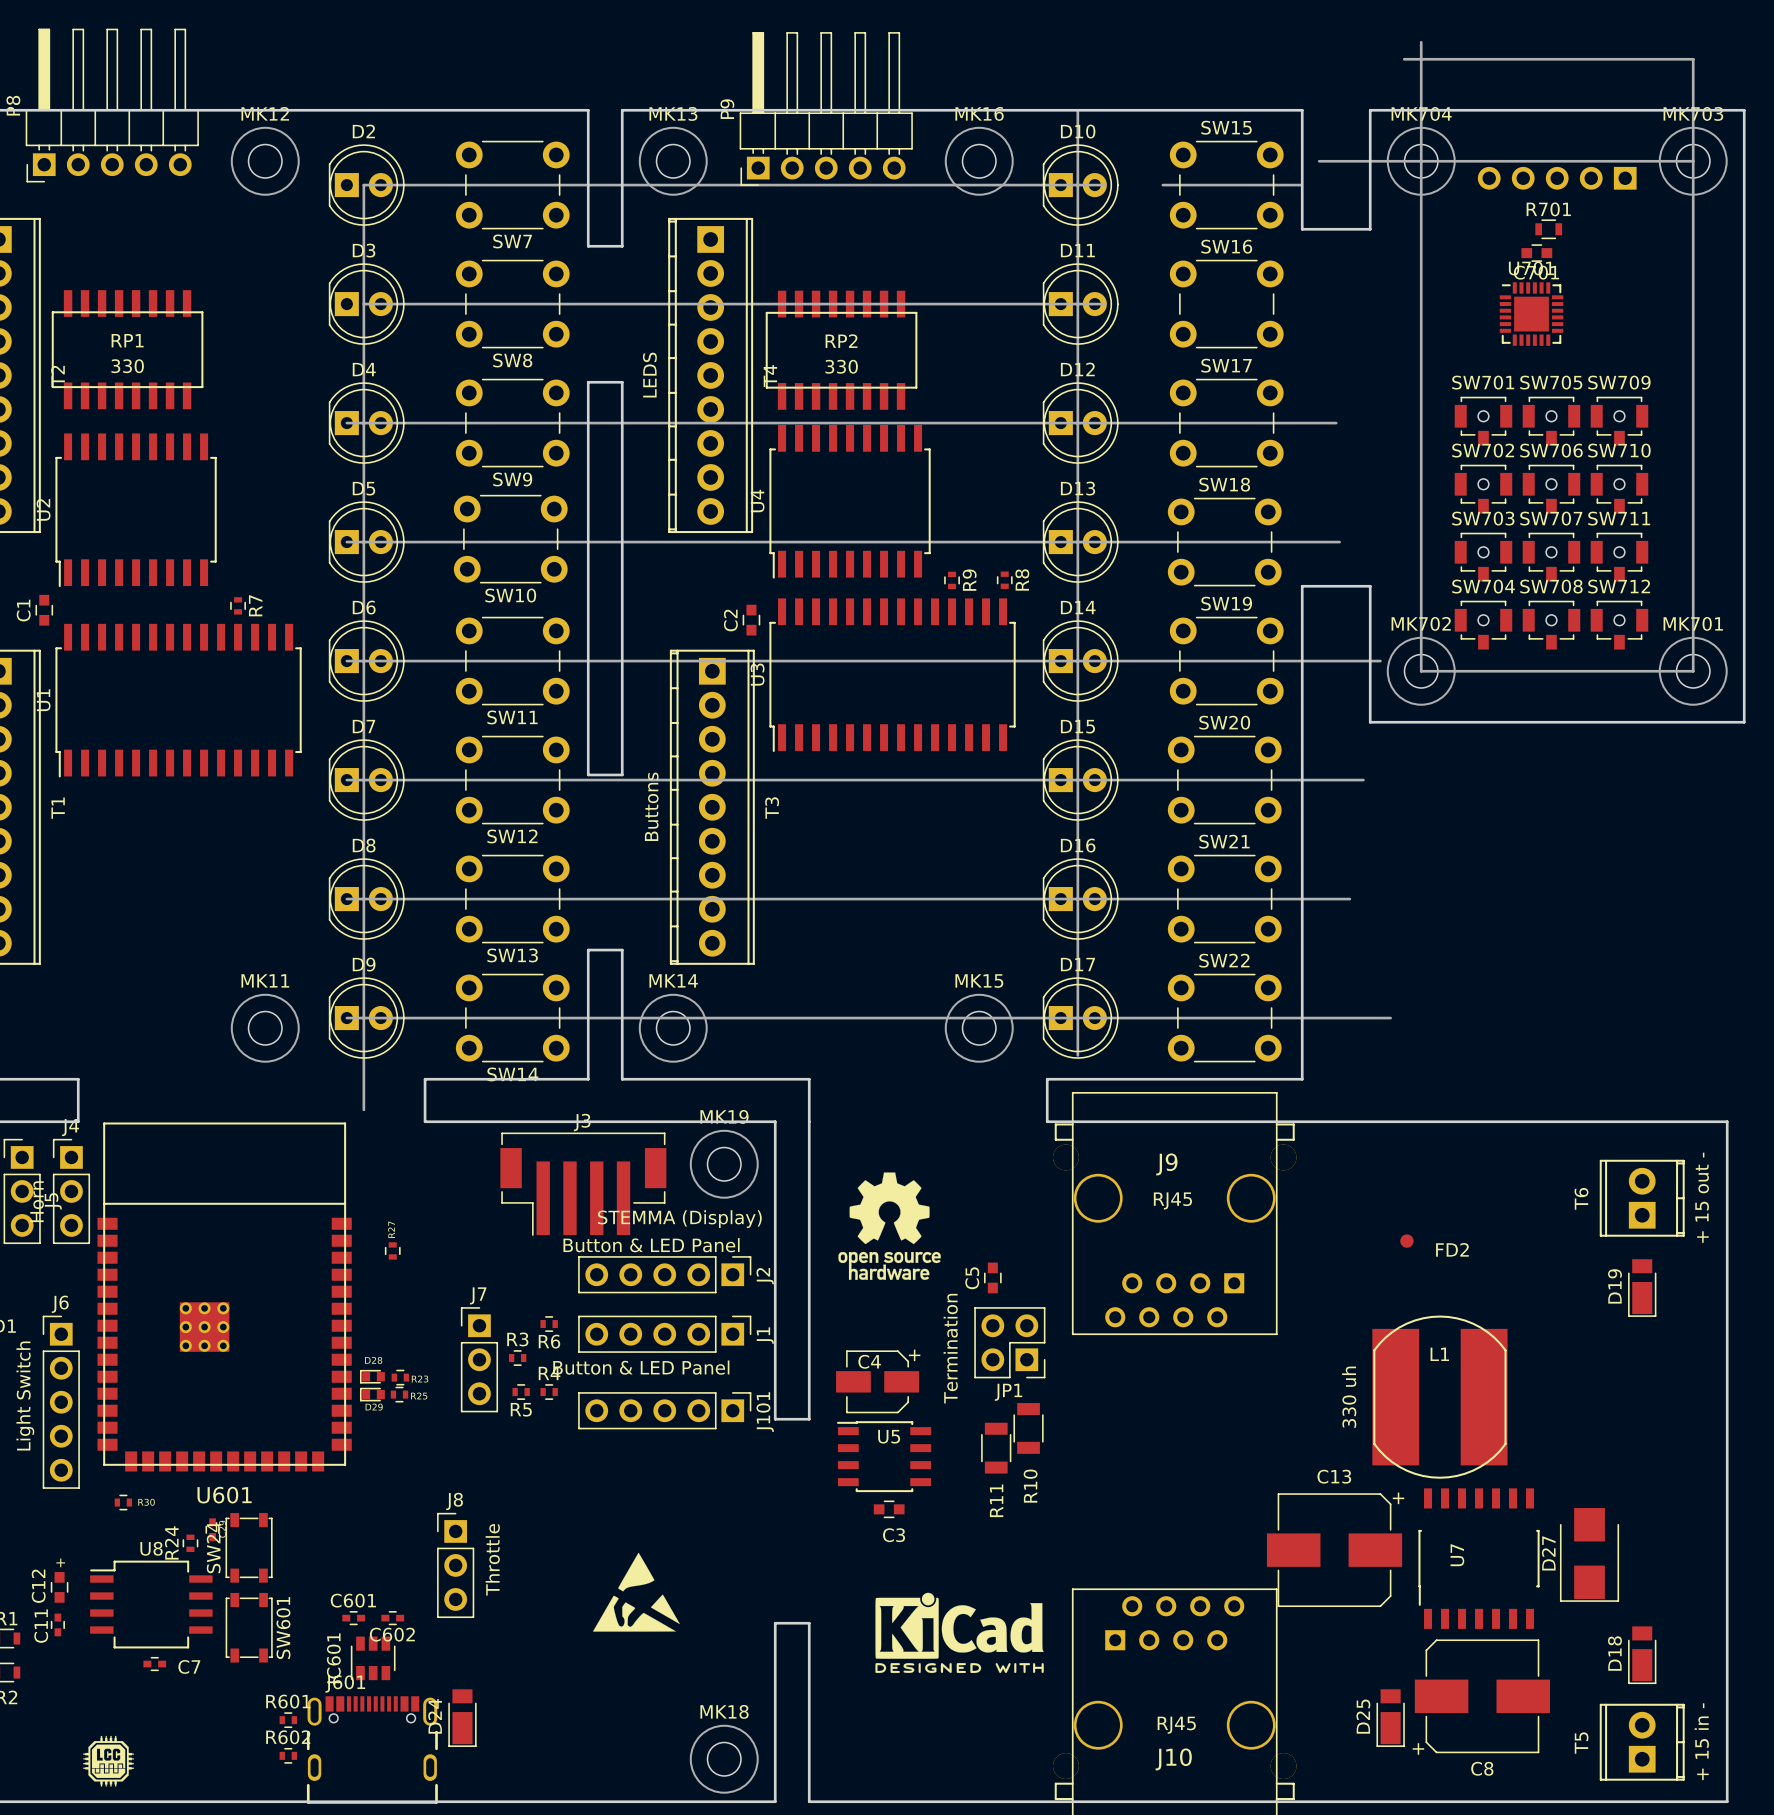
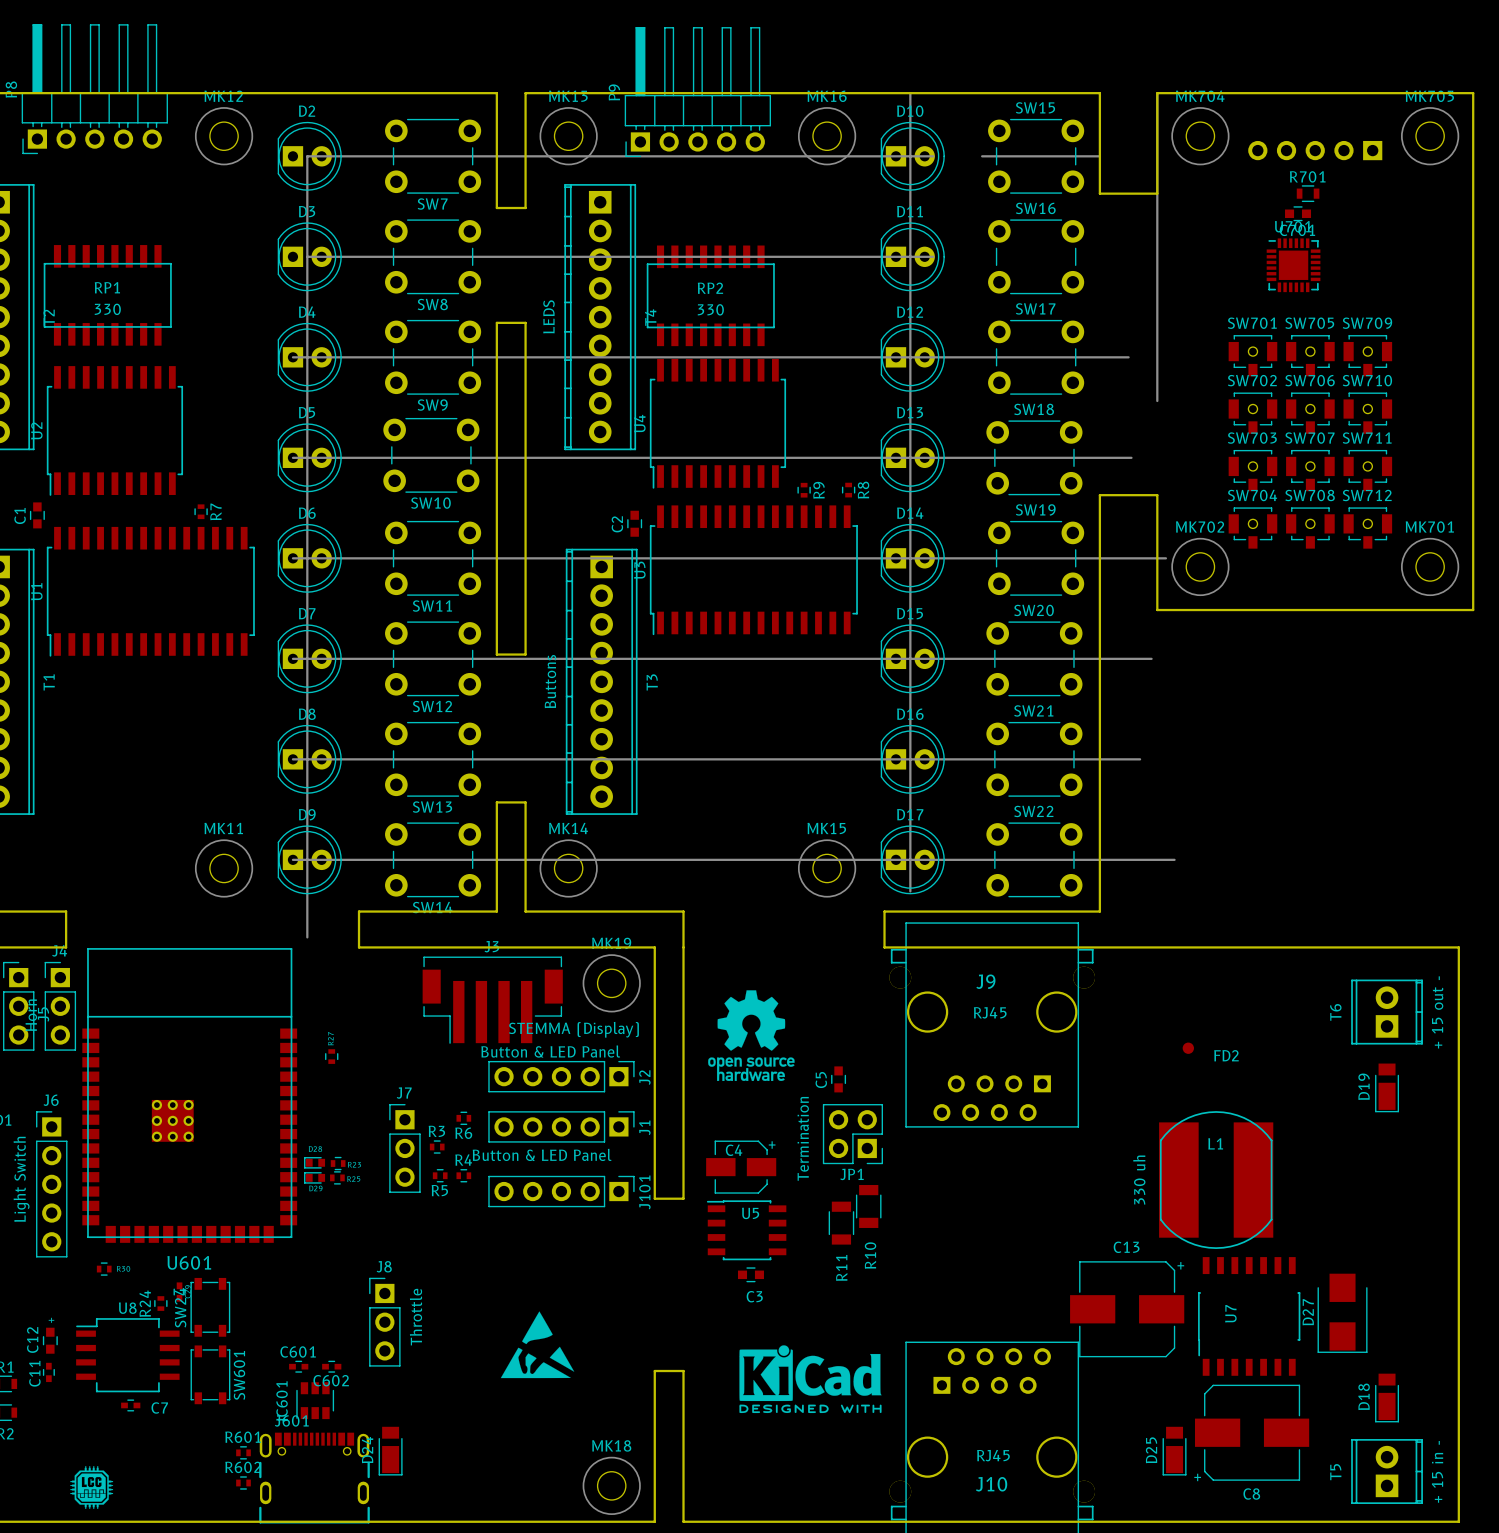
line: (1421, 42) (1421, 671) (1693, 671) (1693, 59) (1404, 59) -> none
line: none -> (1157, 94) (1157, 400)
line: (1319, 161) (1693, 161) -> none

